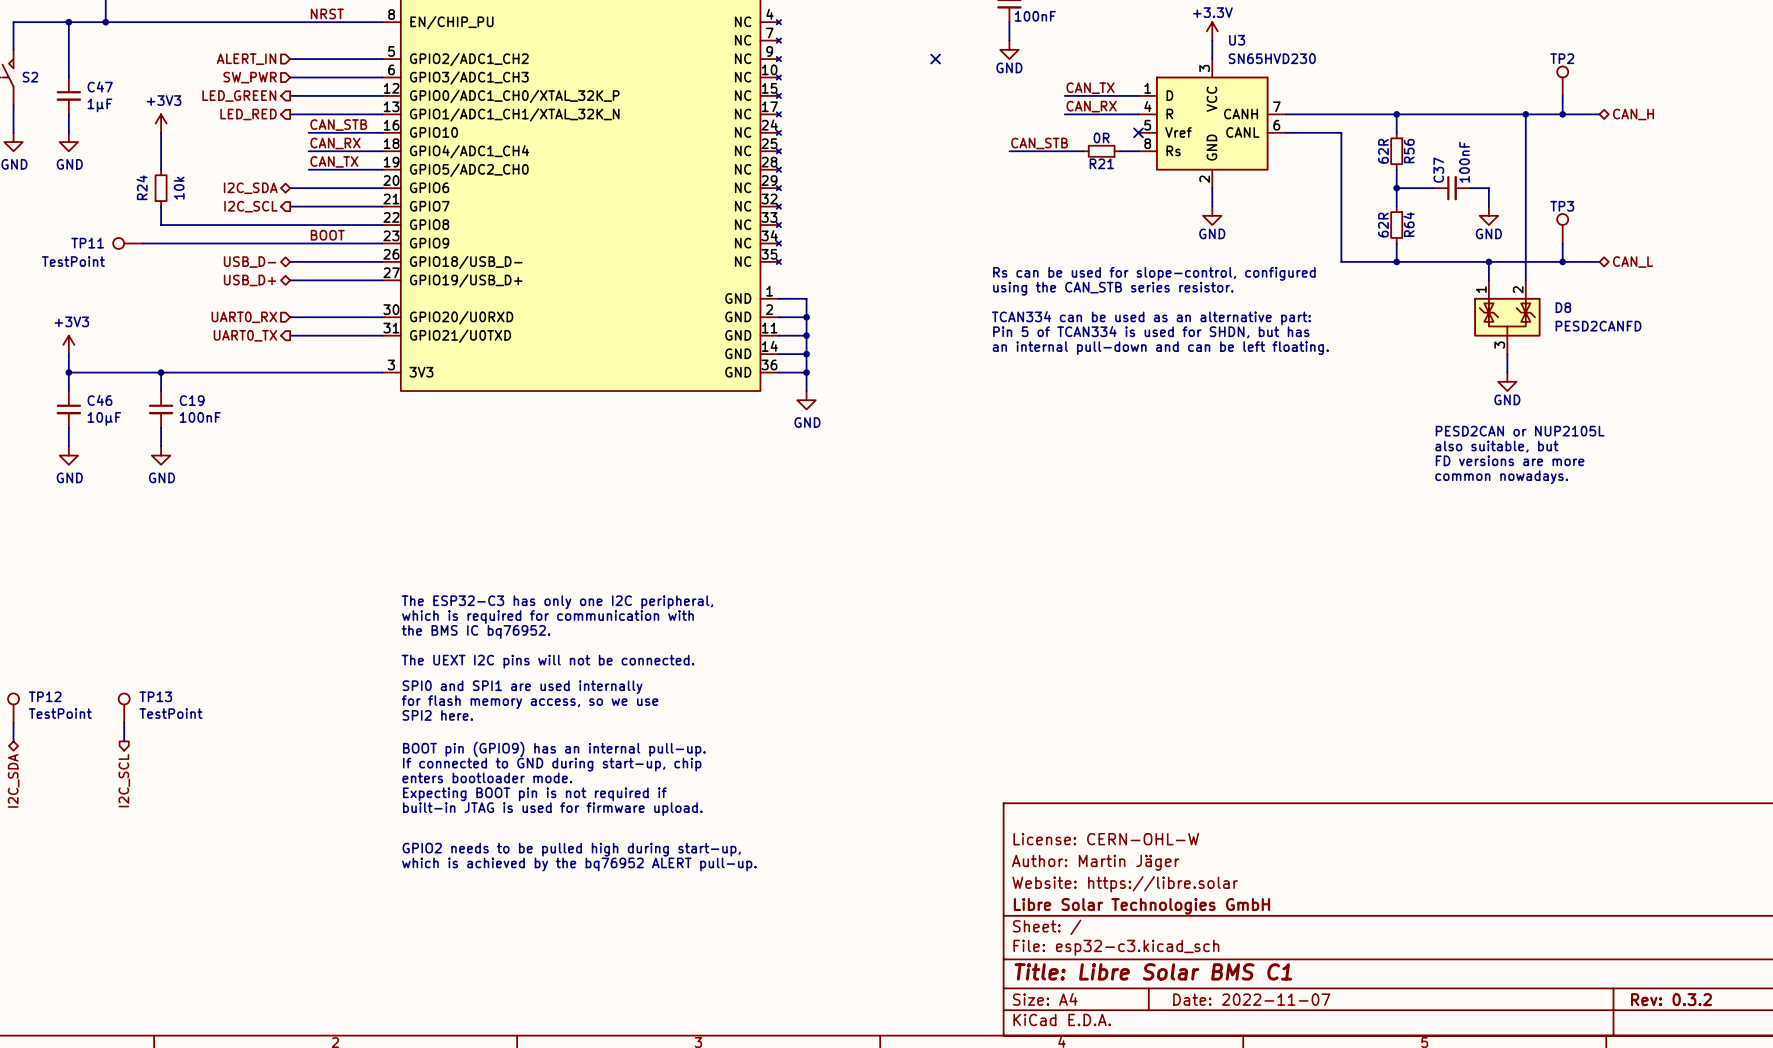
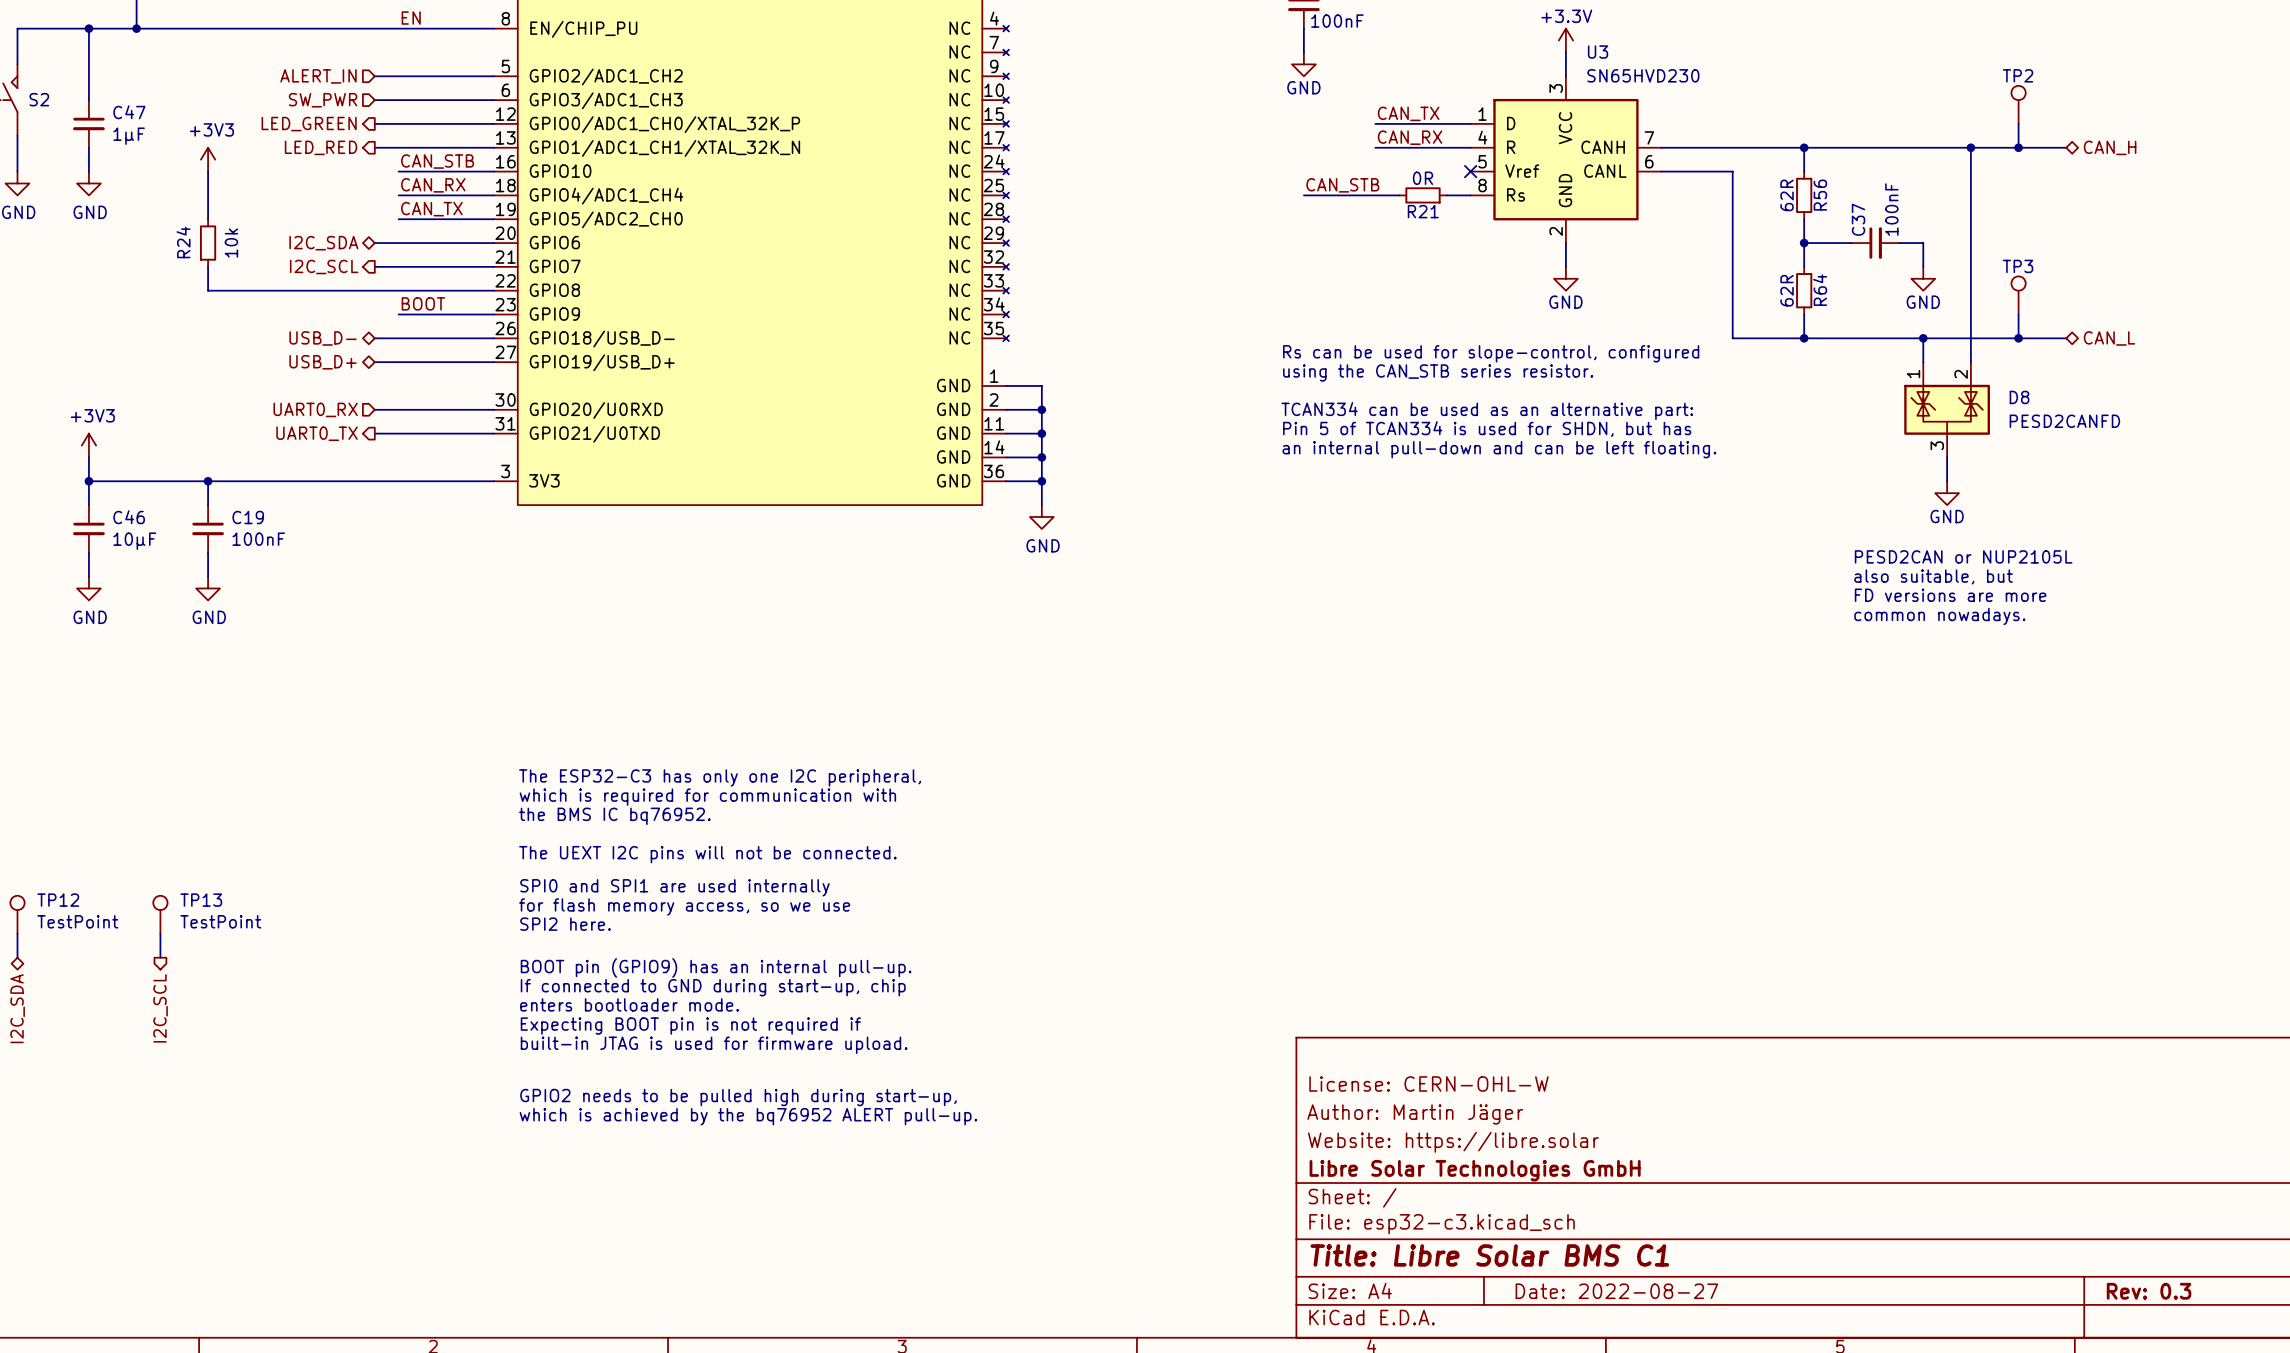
label: NRST (327, 13) -> EN (411, 18)
no-connect mark: (935, 59) -> none
TP11: TestPoint (127, 243) -> none
wire: (142, 243) (308, 243) -> none
title block: Date: 2022-11-07 (1251, 999) -> Date: 2022-08-27 (1616, 1291)
title block: Rev: 0.3.2 (1671, 999) -> Rev: 0.3 (2149, 1291)

